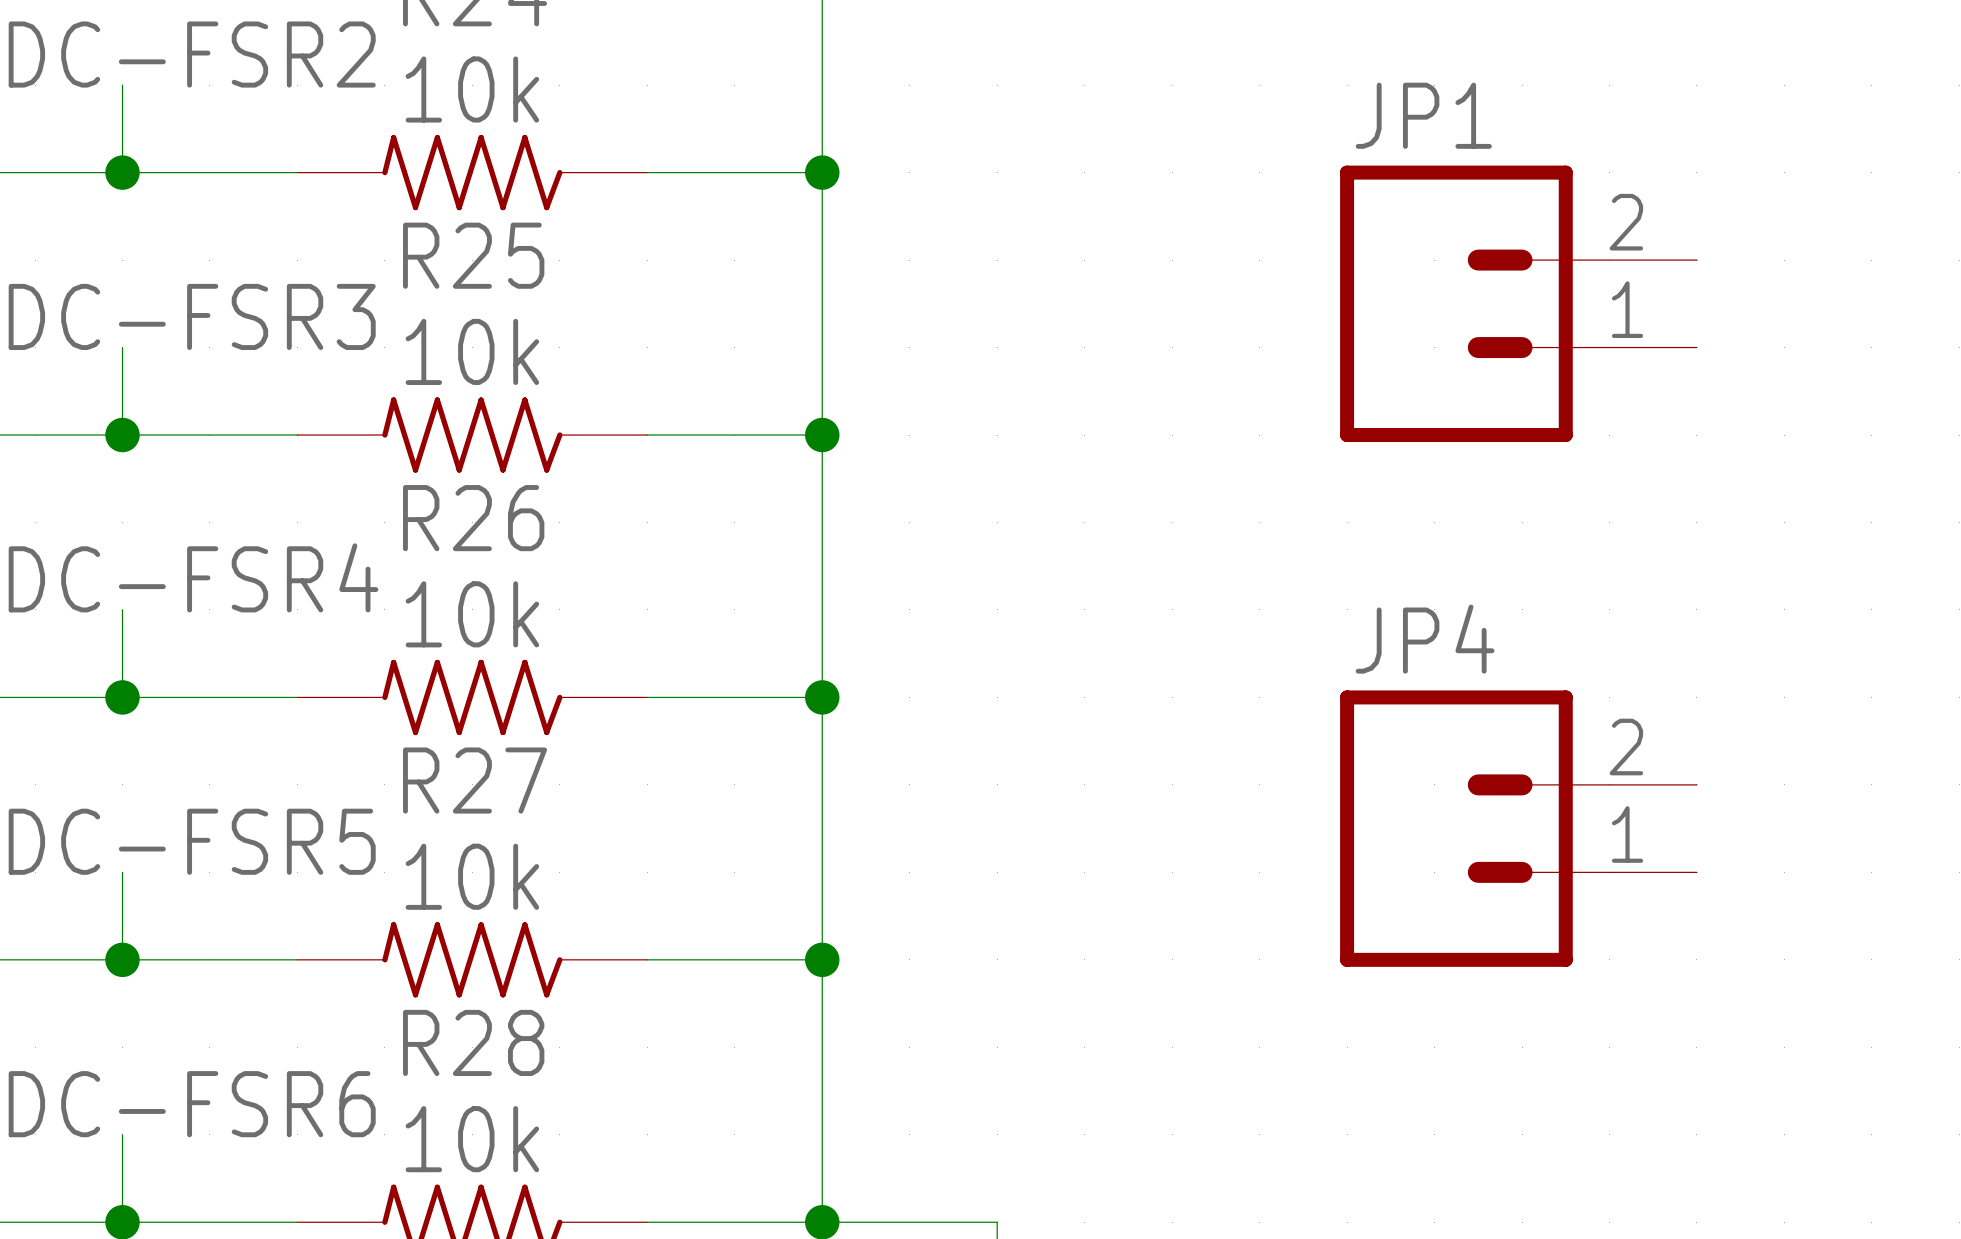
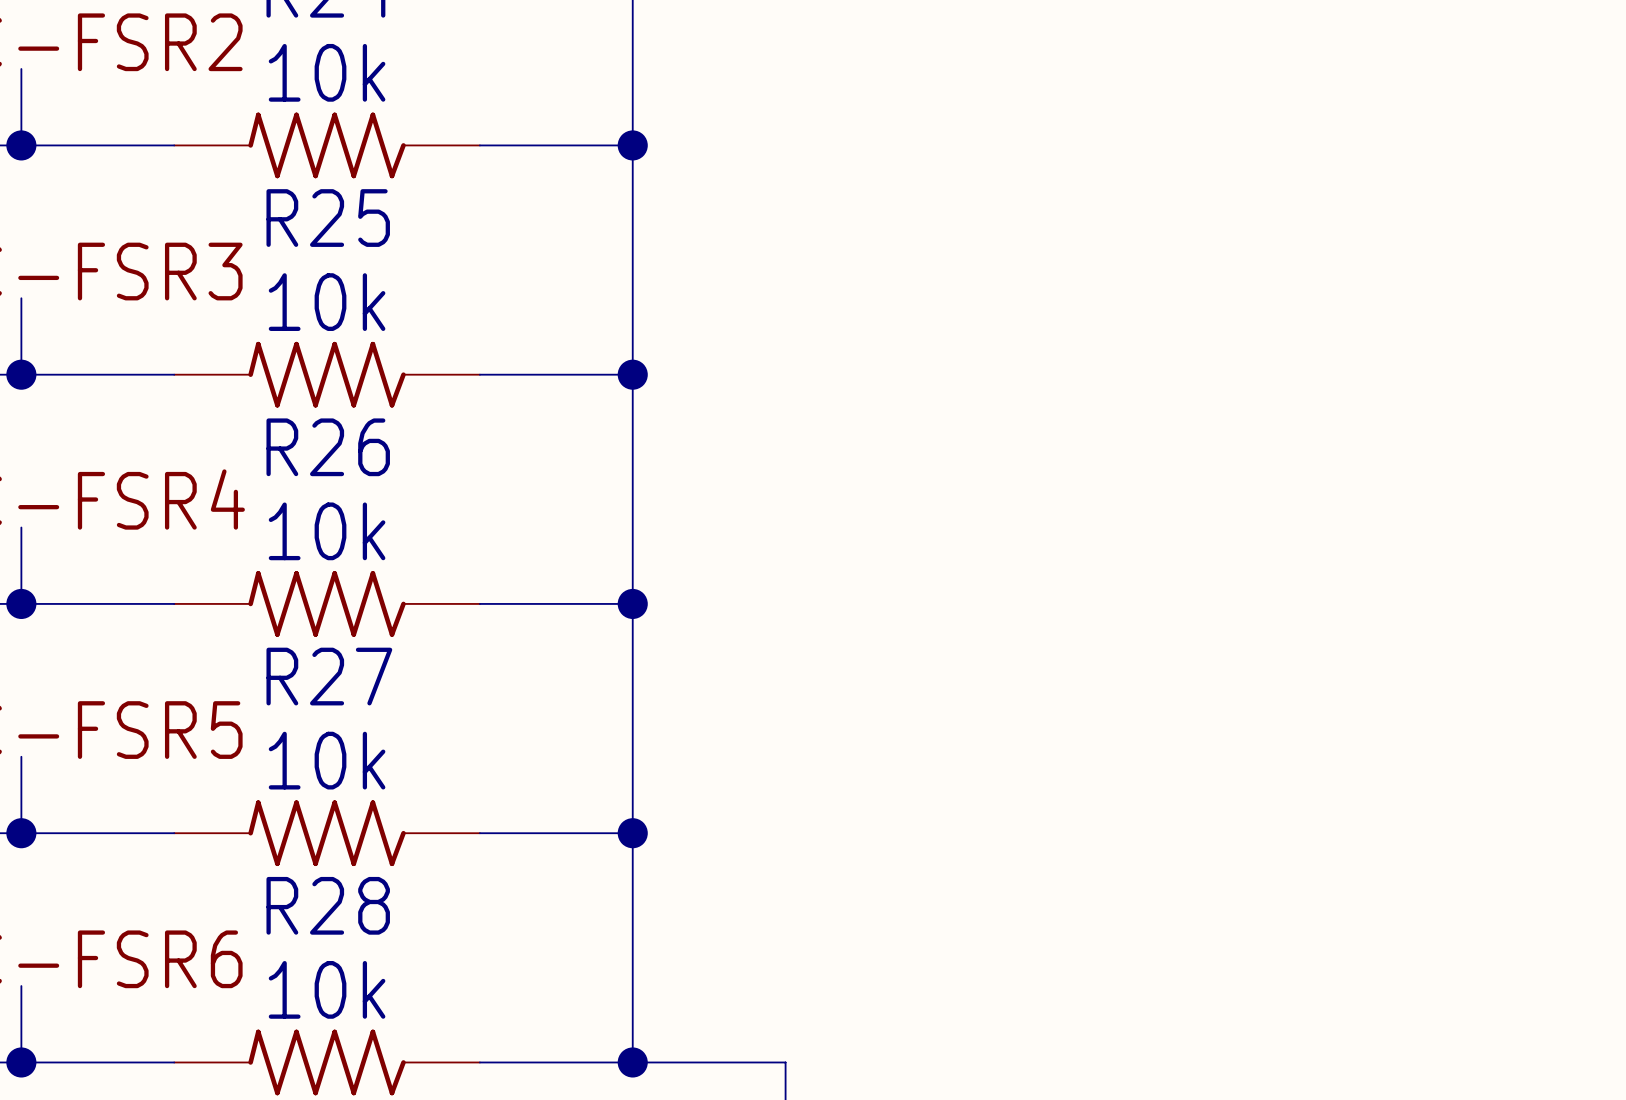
JP1: (1518, 303) -> none
JP4: (1518, 828) -> none

